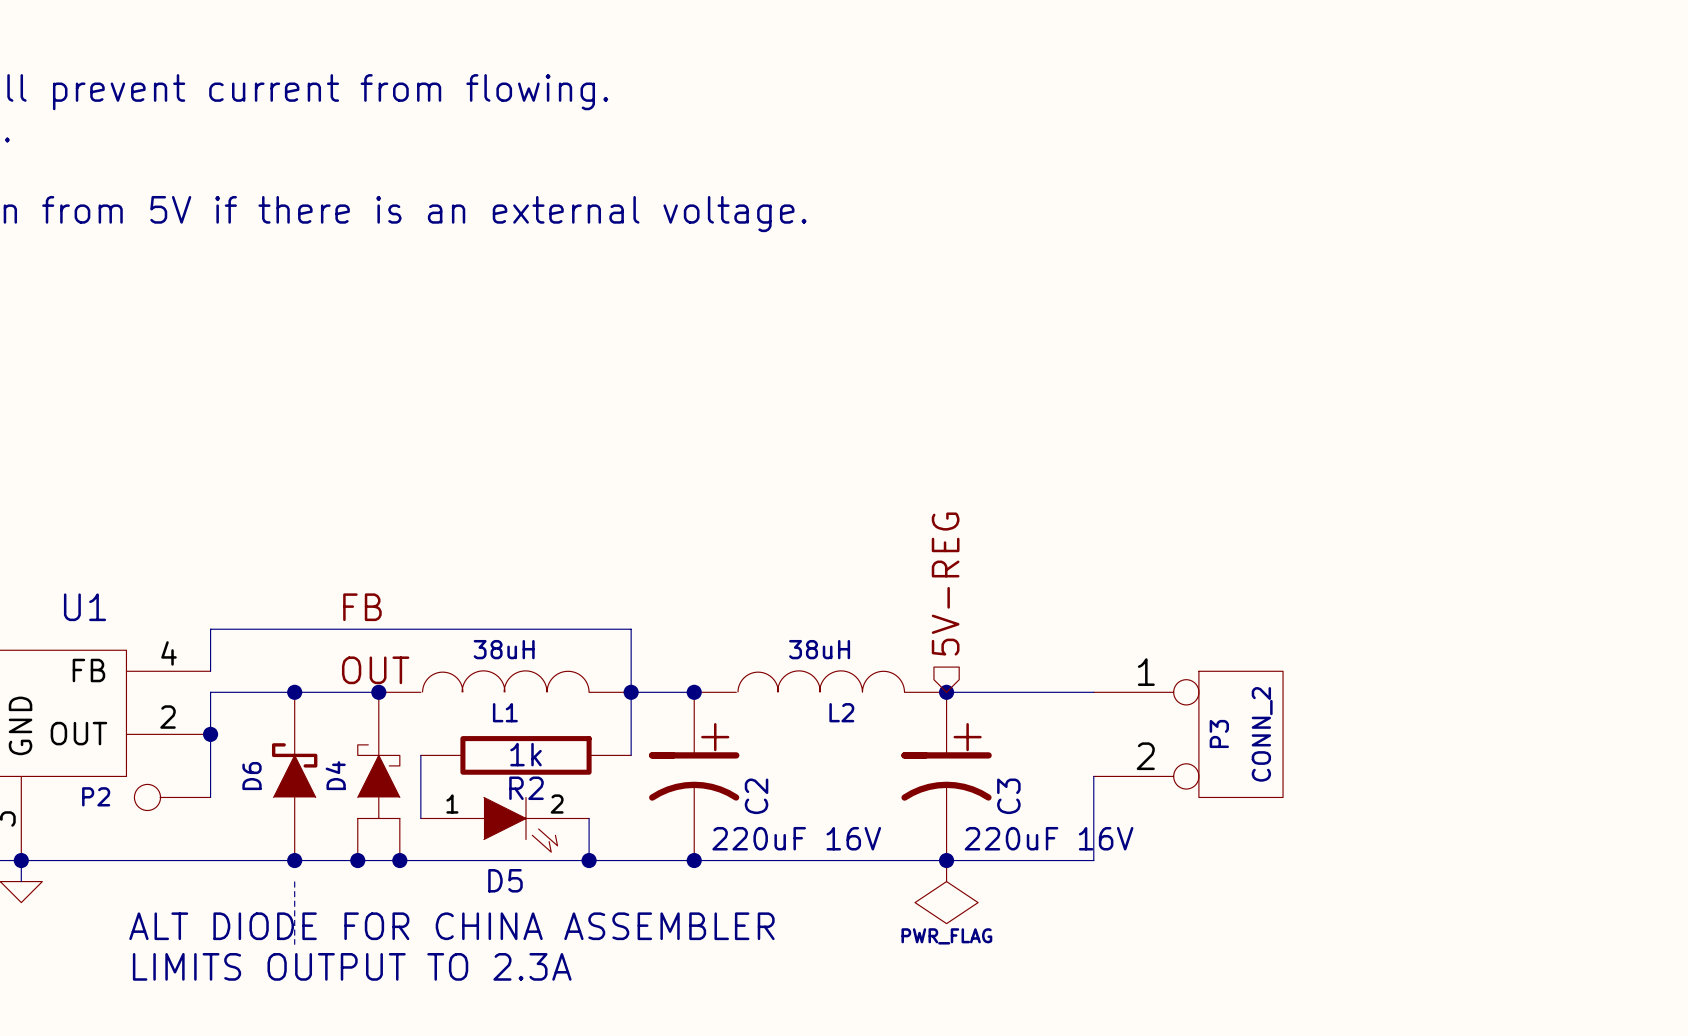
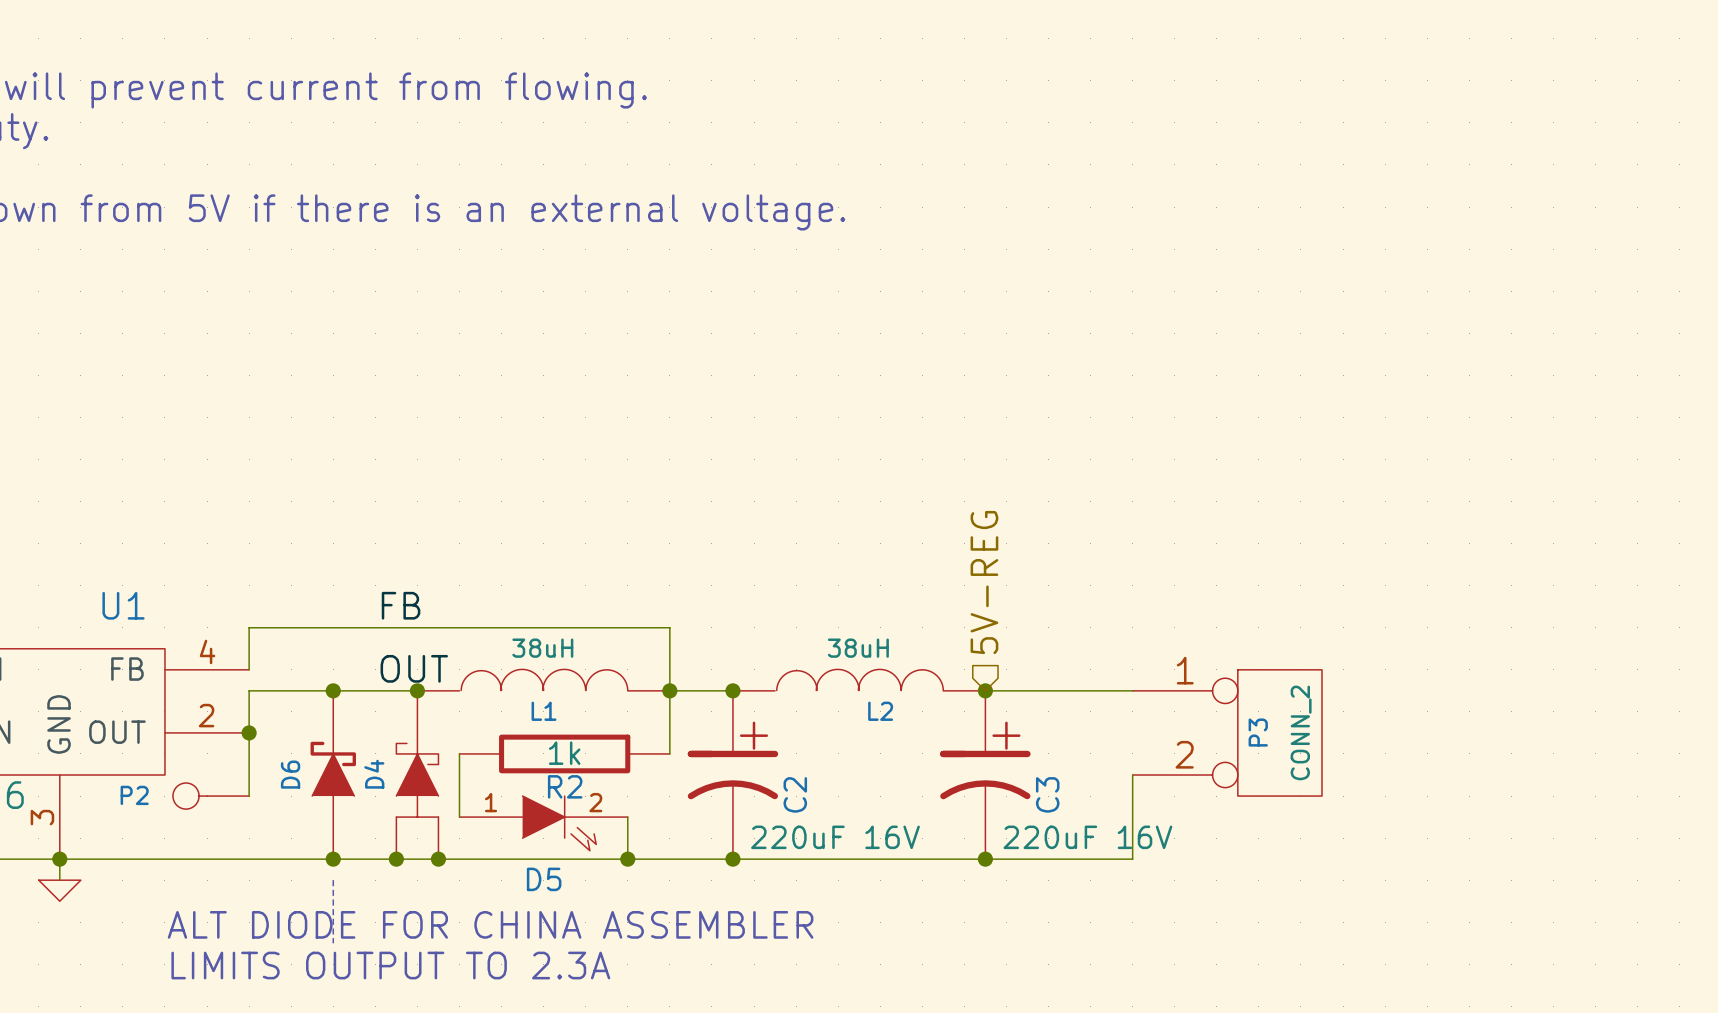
power symbol: PWR_FLAG (946, 892) -> none

